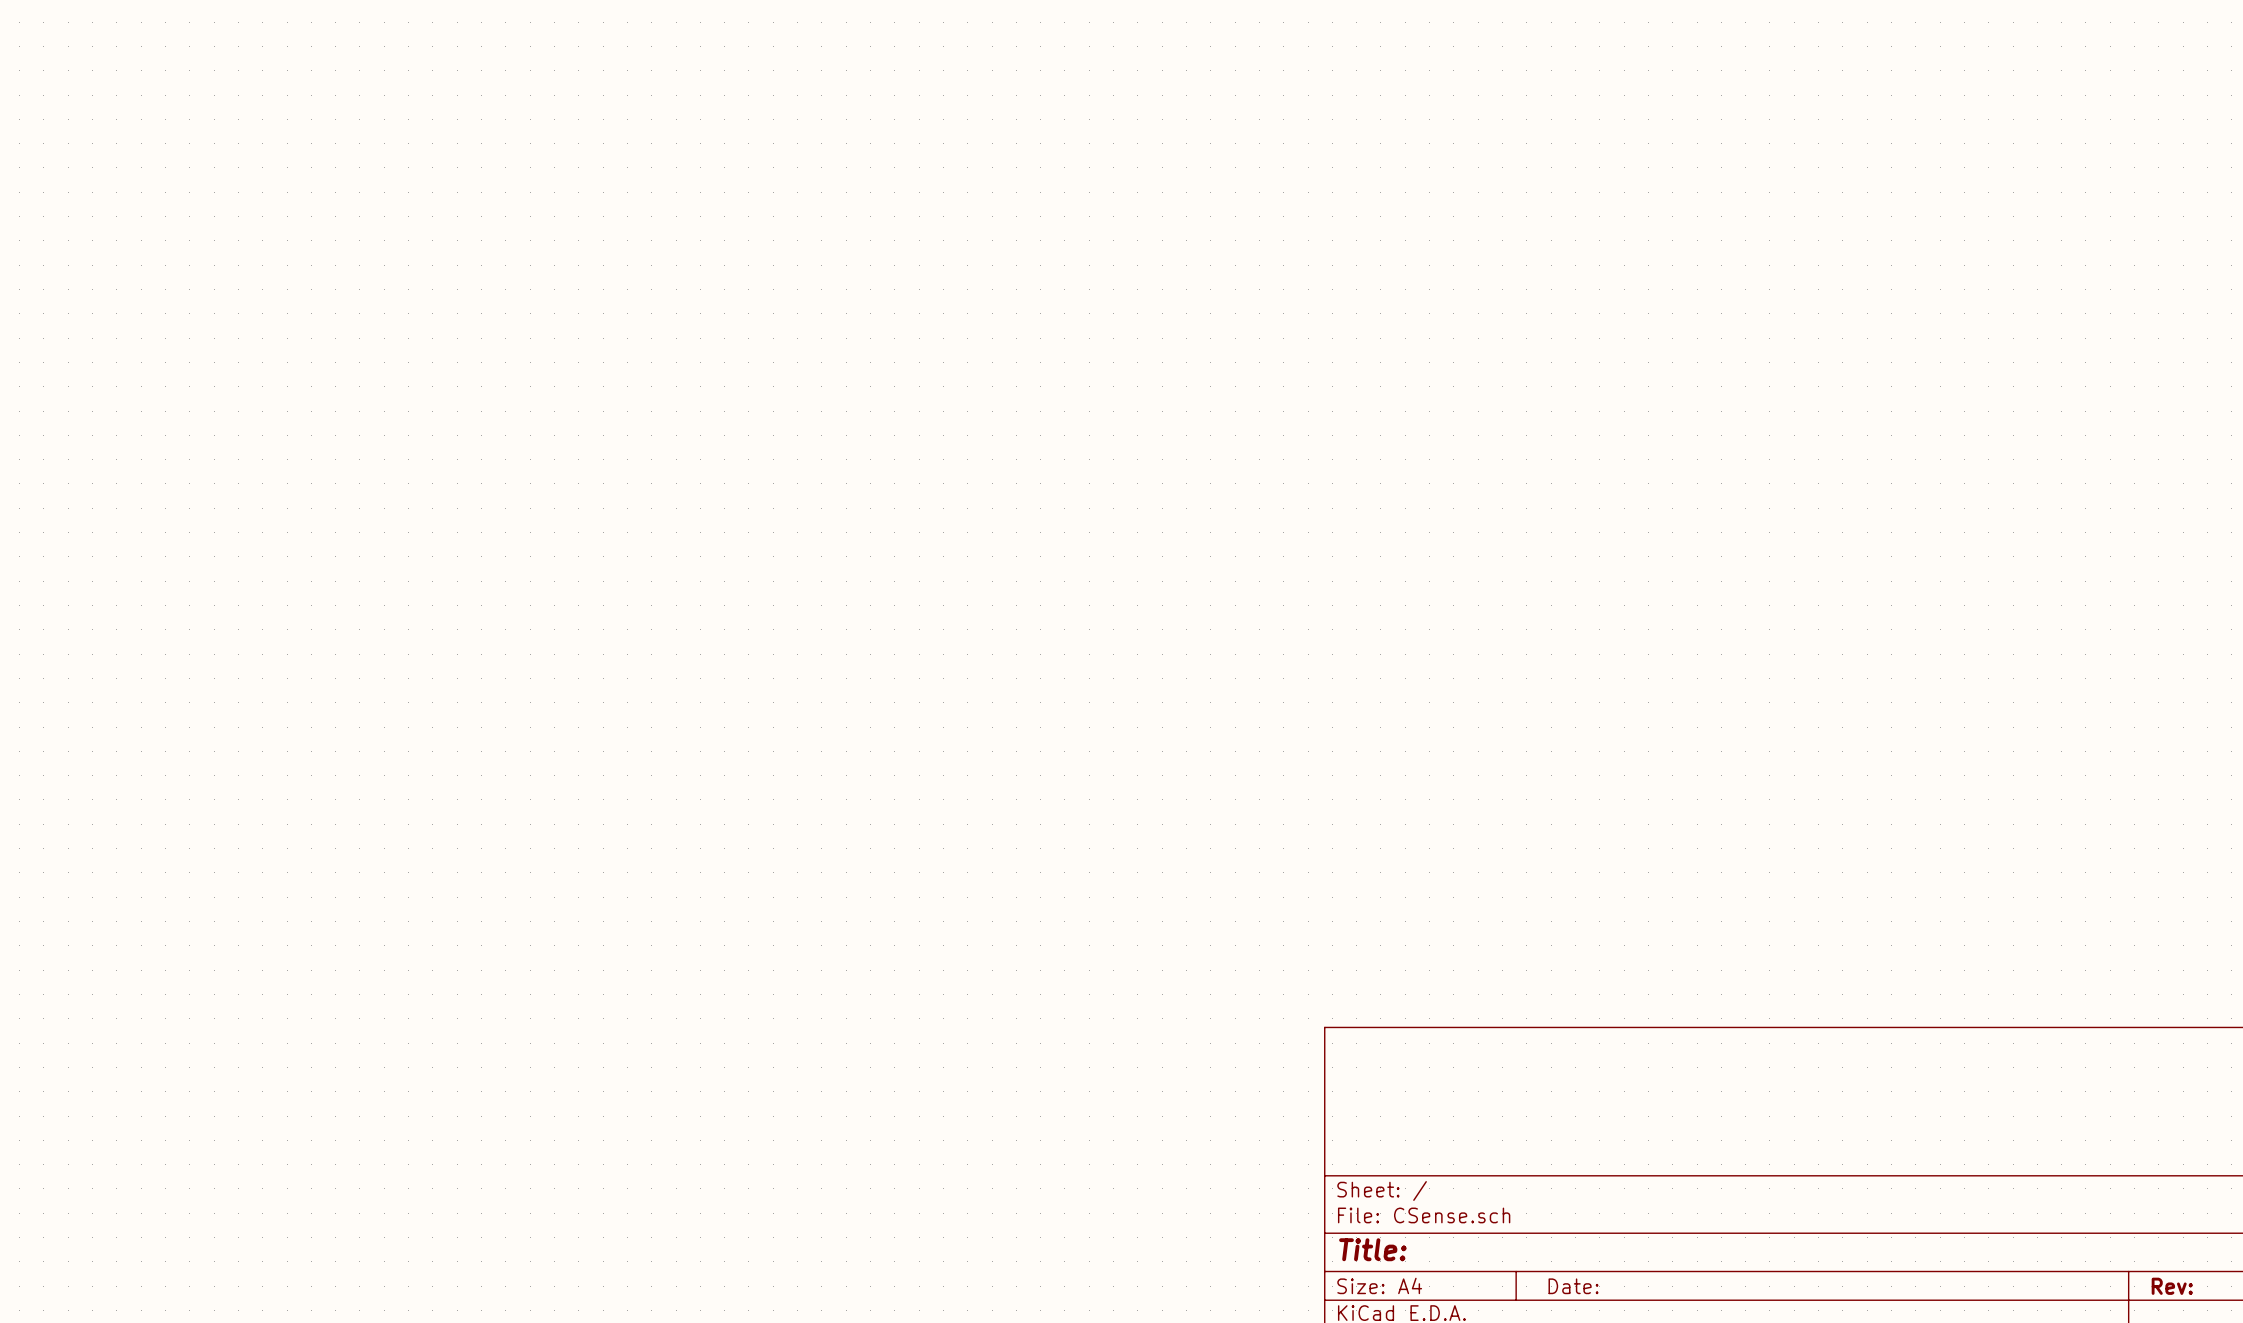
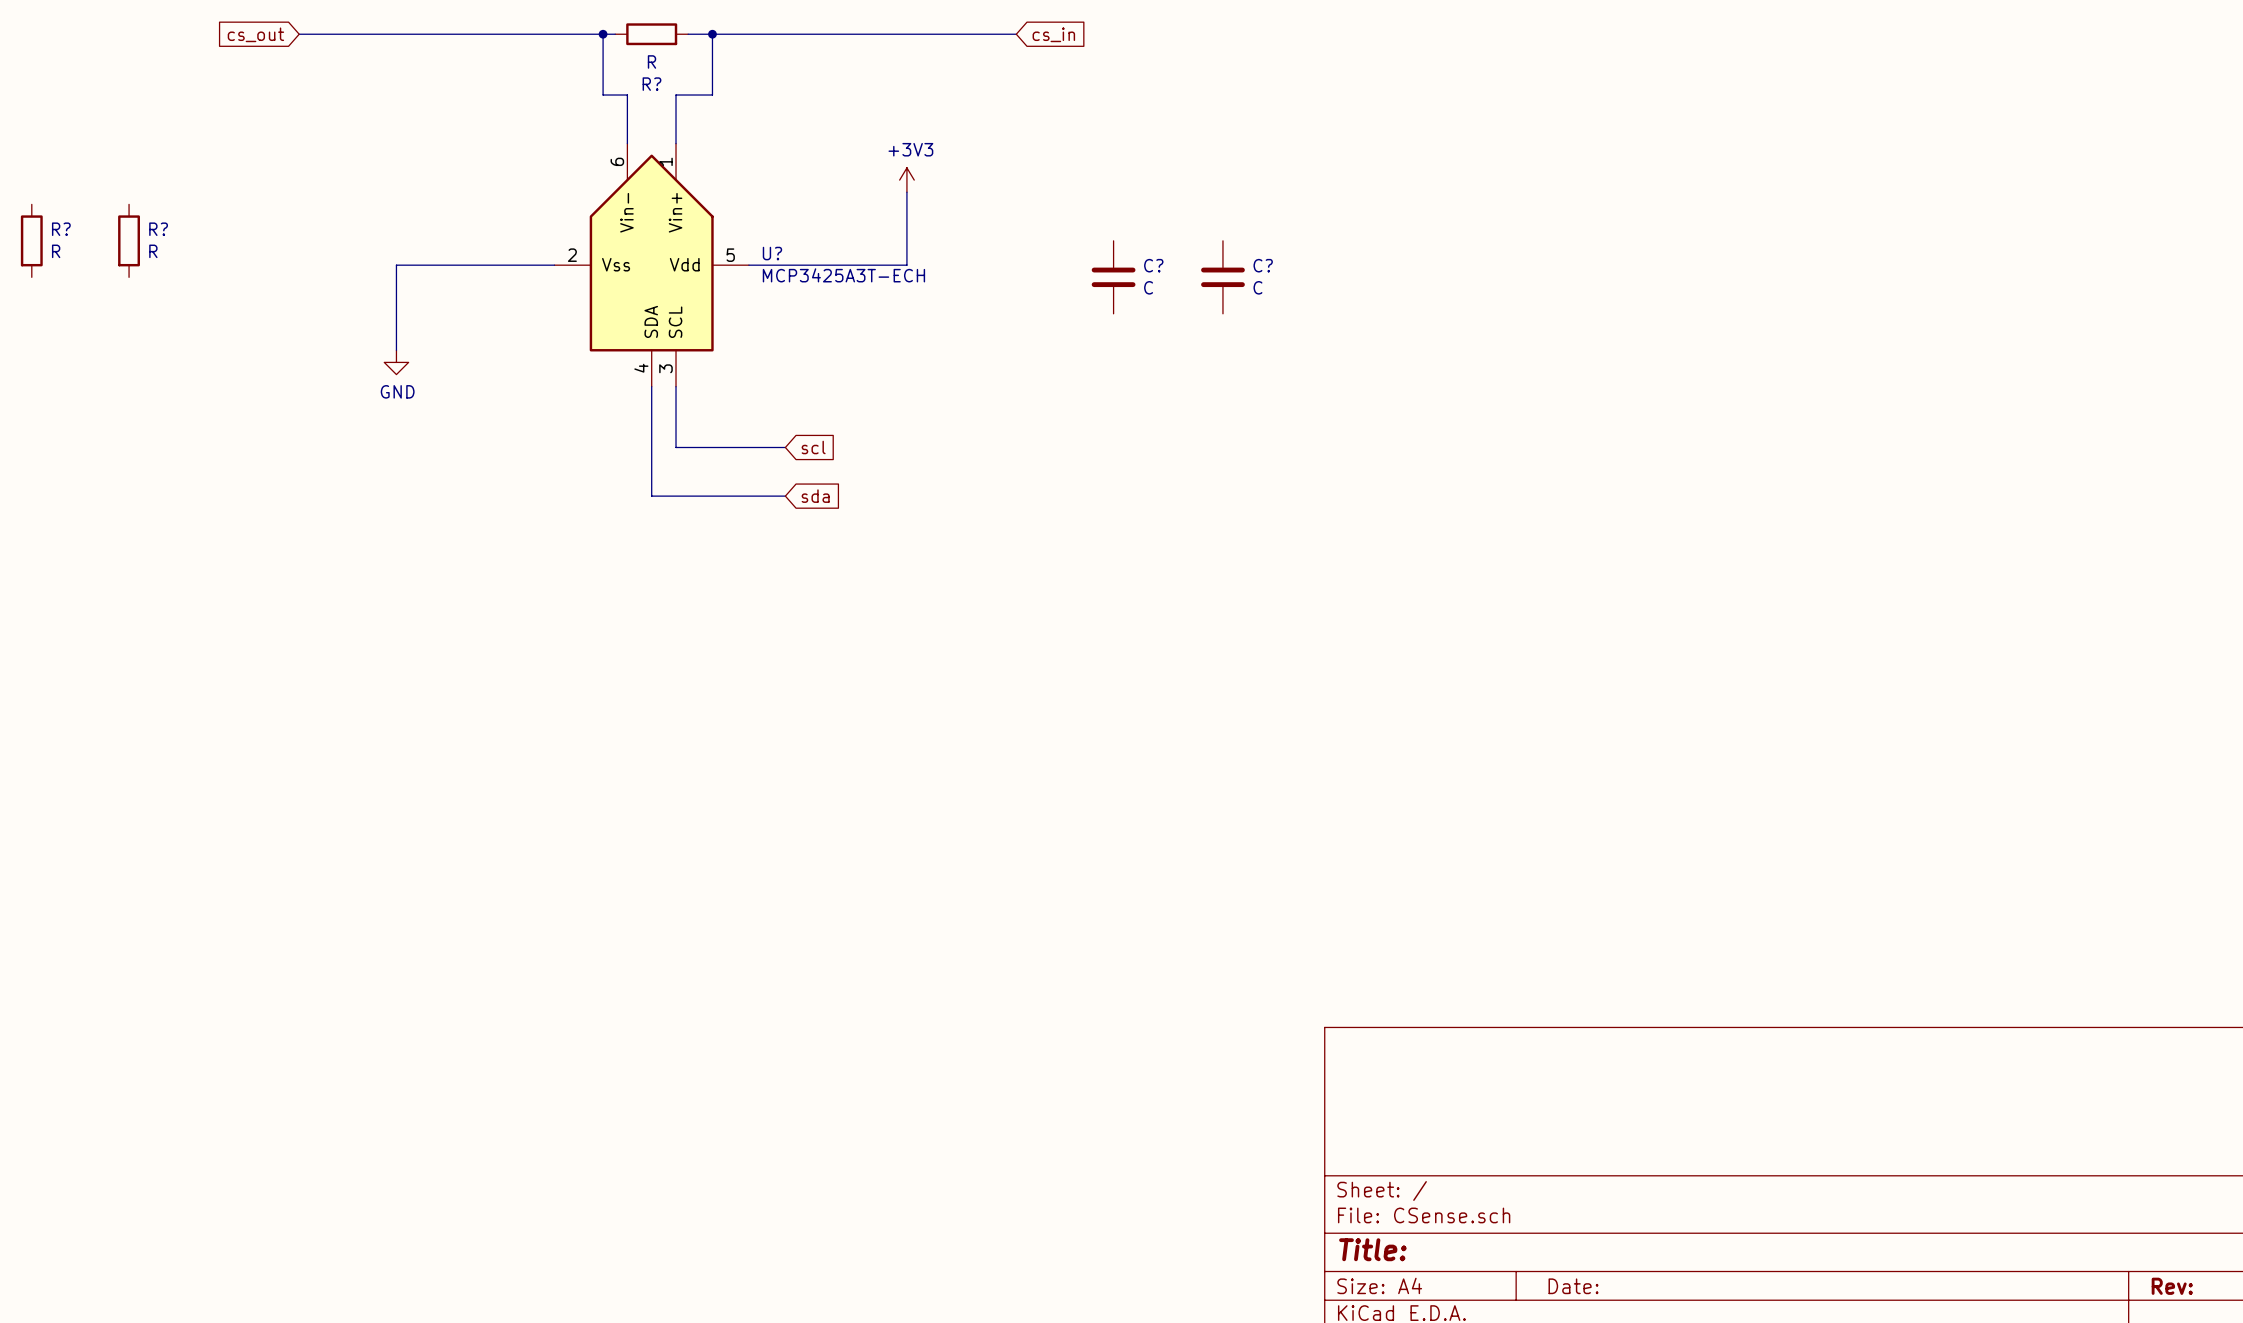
global label: none -> cs_out (255, 34)
wire: none -> (299, 34) (615, 34)
wire: none -> (603, 34) (603, 95) (627, 95) (627, 143)
junction: none -> (603, 34)
R?: none -> R (651, 34)
wire: none -> (688, 34) (1016, 34)
wire: none -> (712, 34) (712, 95) (676, 95) (676, 143)
junction: none -> (712, 34)
global label: none -> cs_in (1053, 34)
power symbol: none -> +3V3 (906, 180)
wire: none -> (906, 192) (906, 265) (748, 265)
R?: none -> R (31, 240)
R?: none -> R (129, 240)
wire: none -> (554, 265) (396, 265) (396, 350)
U?: none -> MCP3425A3T-ECH (651, 265)
C?: none -> C (1113, 277)
C?: none -> C (1222, 277)
power symbol: none -> GND (396, 362)
wire: none -> (651, 386) (651, 496) (785, 496)
wire: none -> (676, 386) (676, 447) (785, 447)
global label: none -> scl (813, 447)
global label: none -> sda (815, 496)

